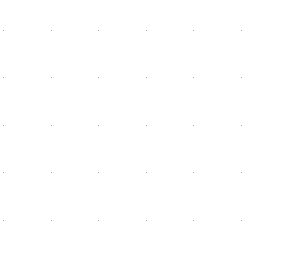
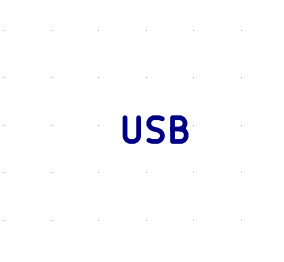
text: none -> USB (155, 129)

